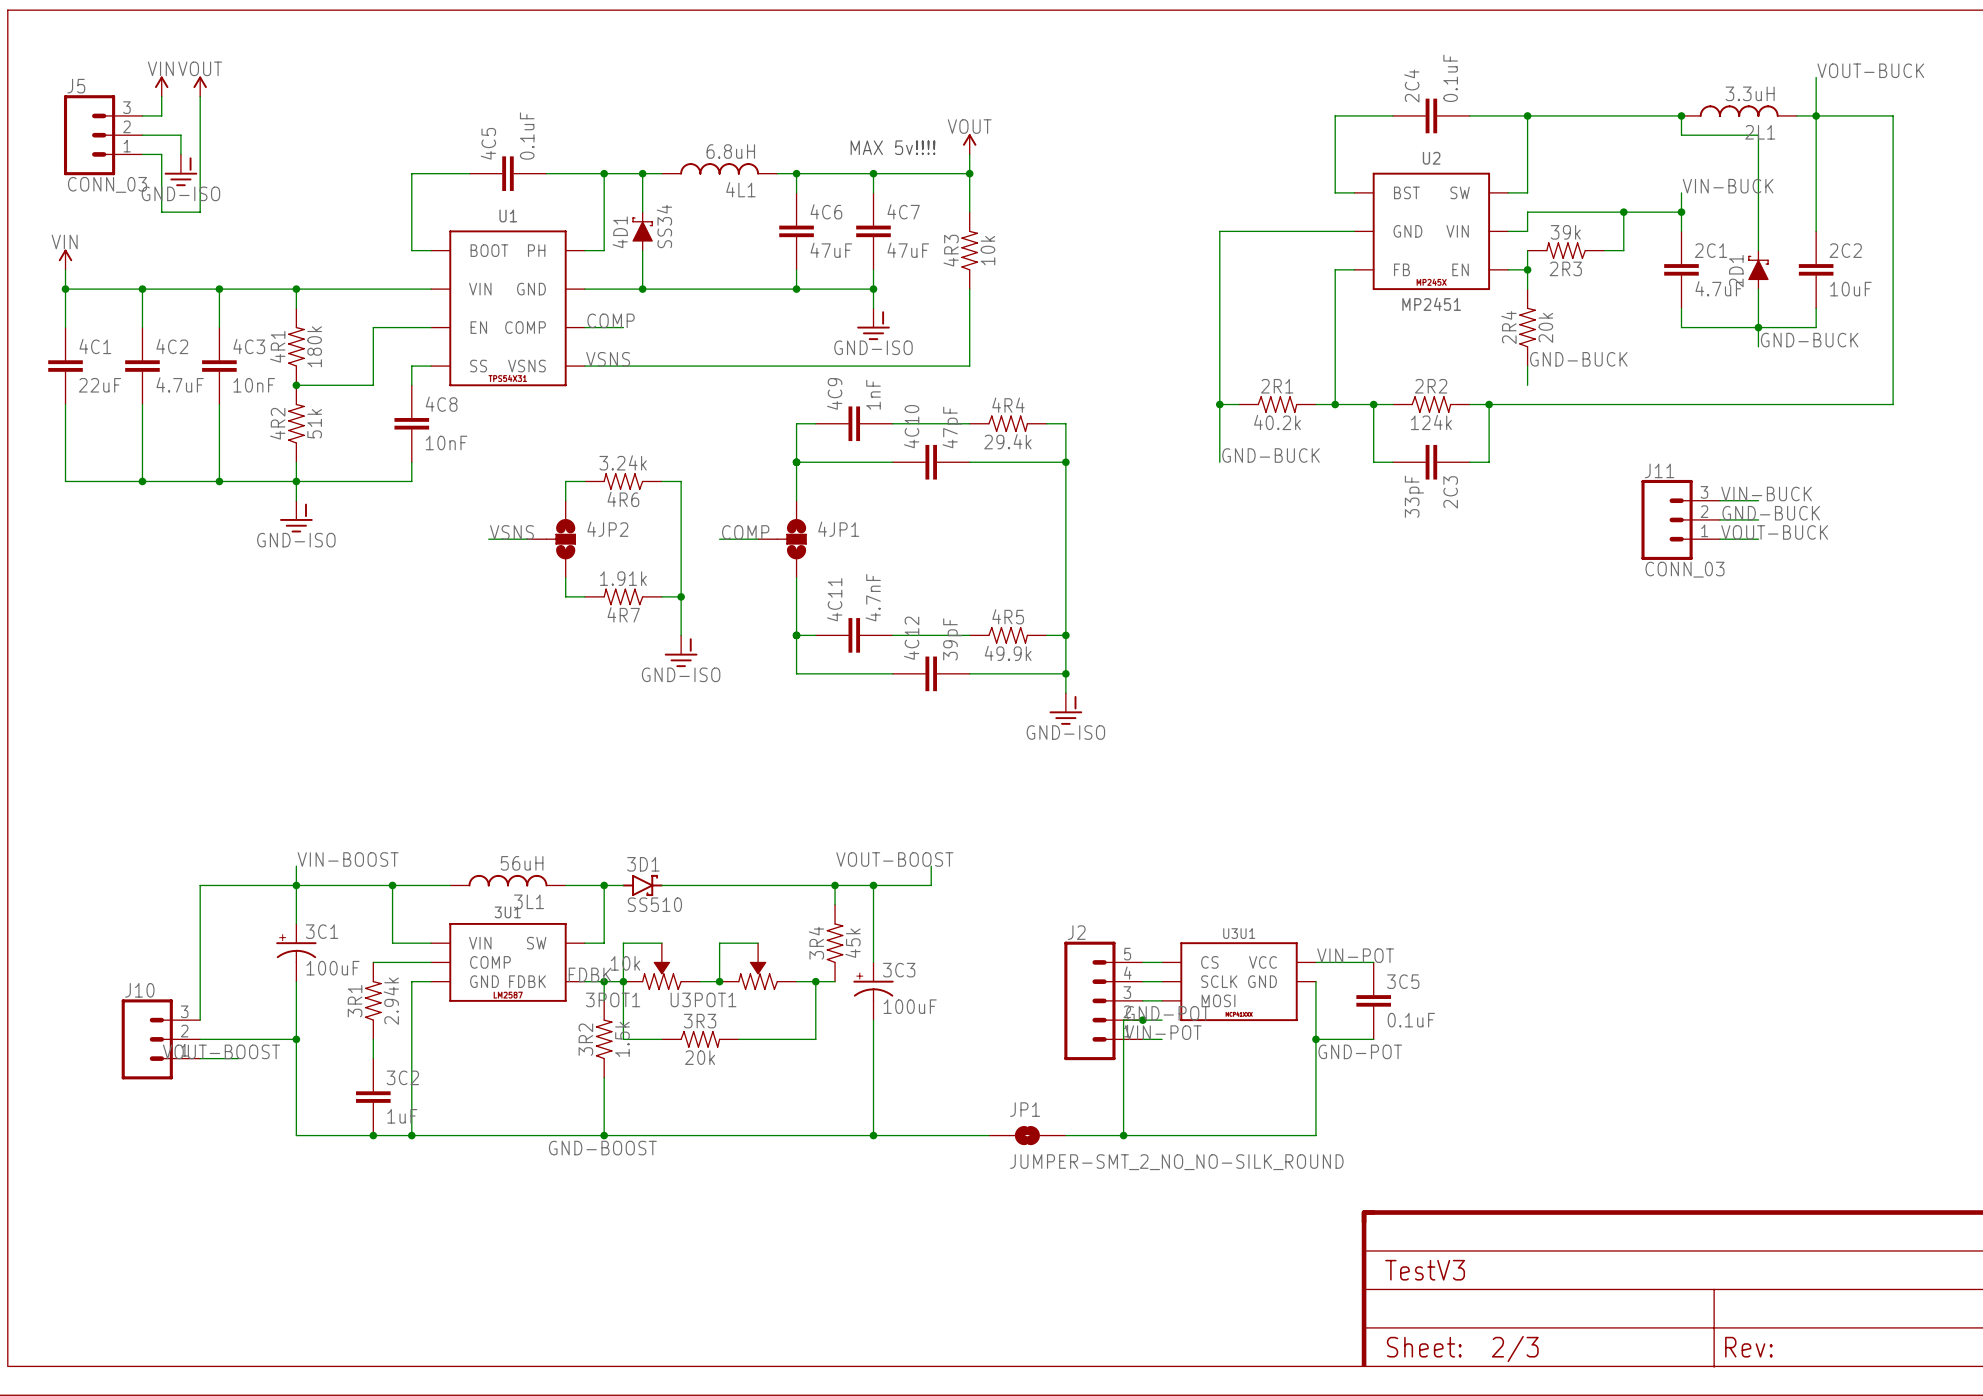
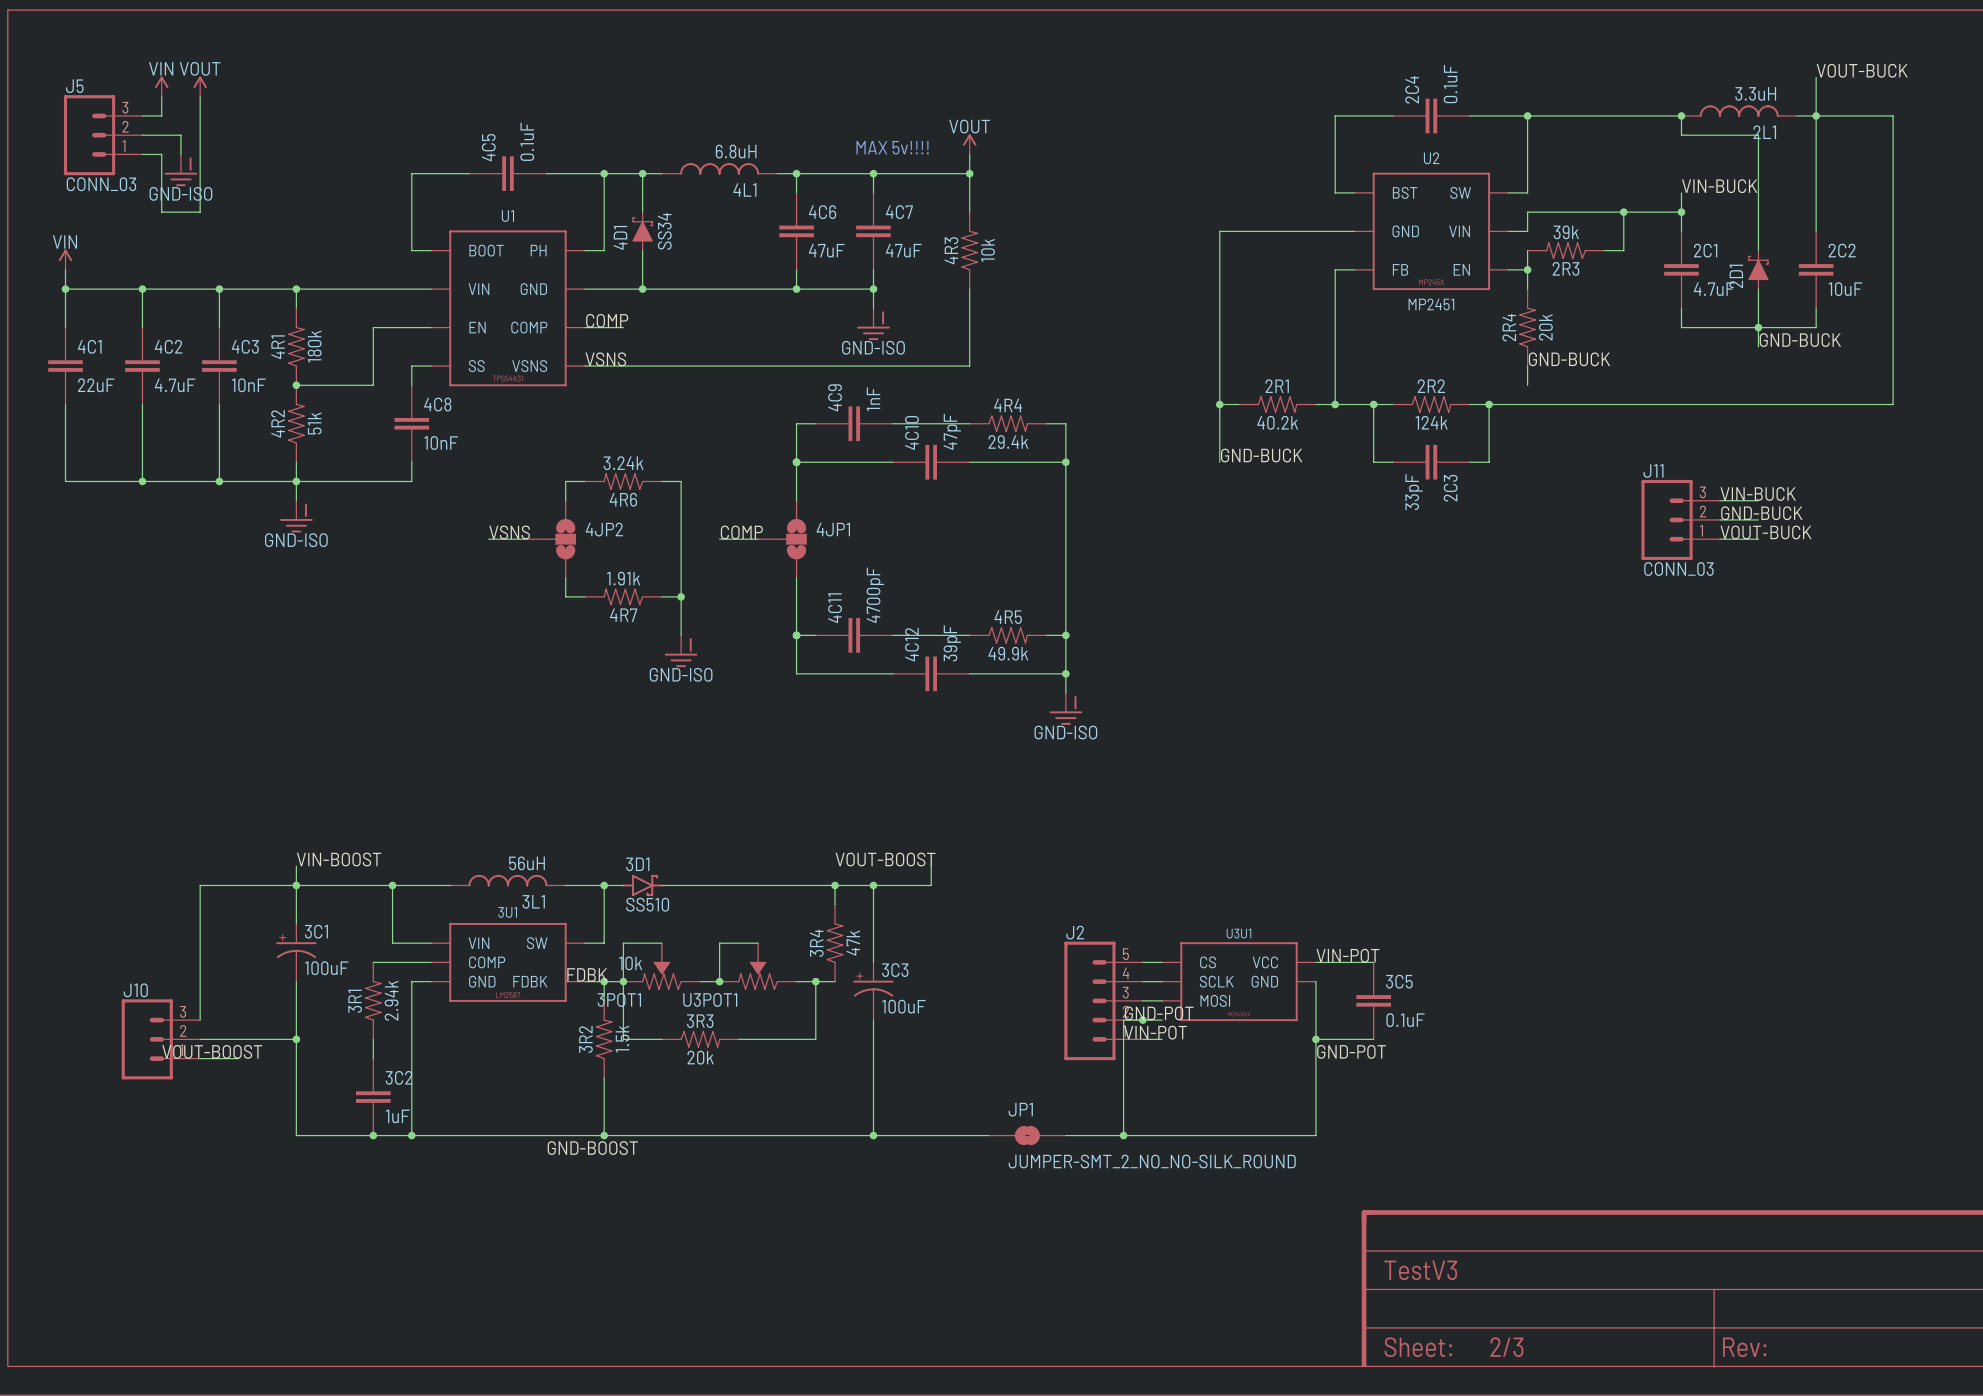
4C11 value: 4.7nF (873, 597) -> 4700pF (875, 595)
3R4 value: 45k (852, 943) -> 47k (853, 943)

